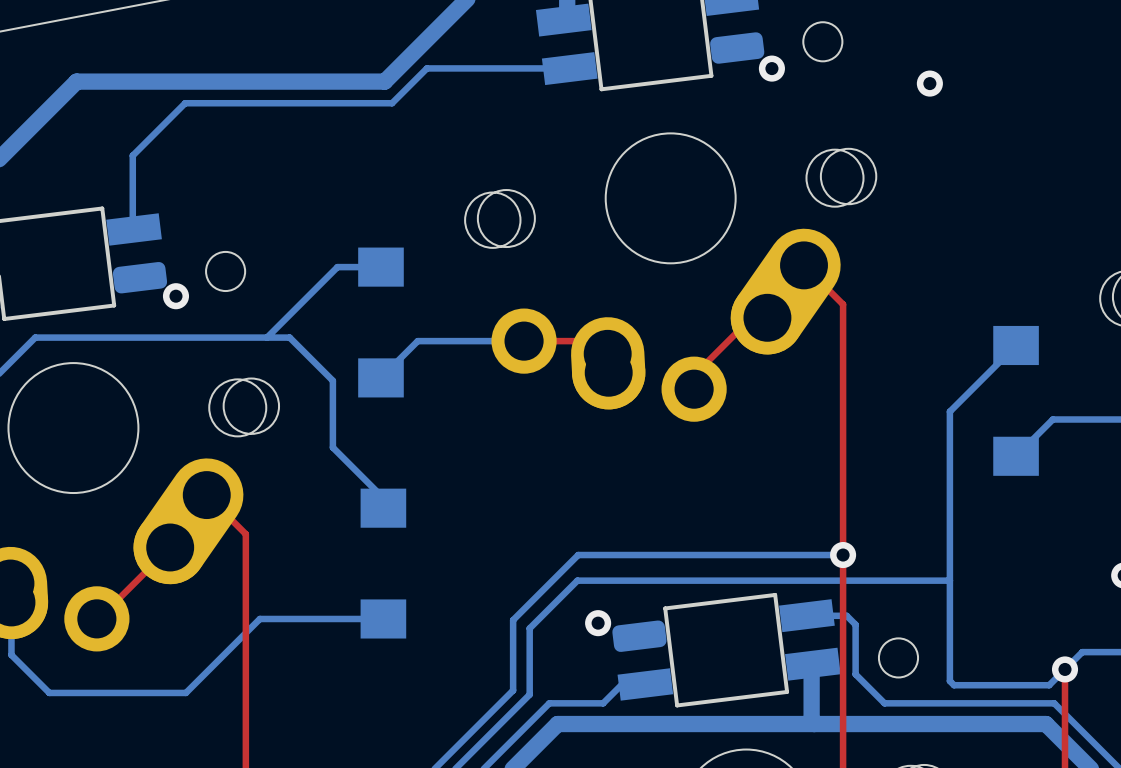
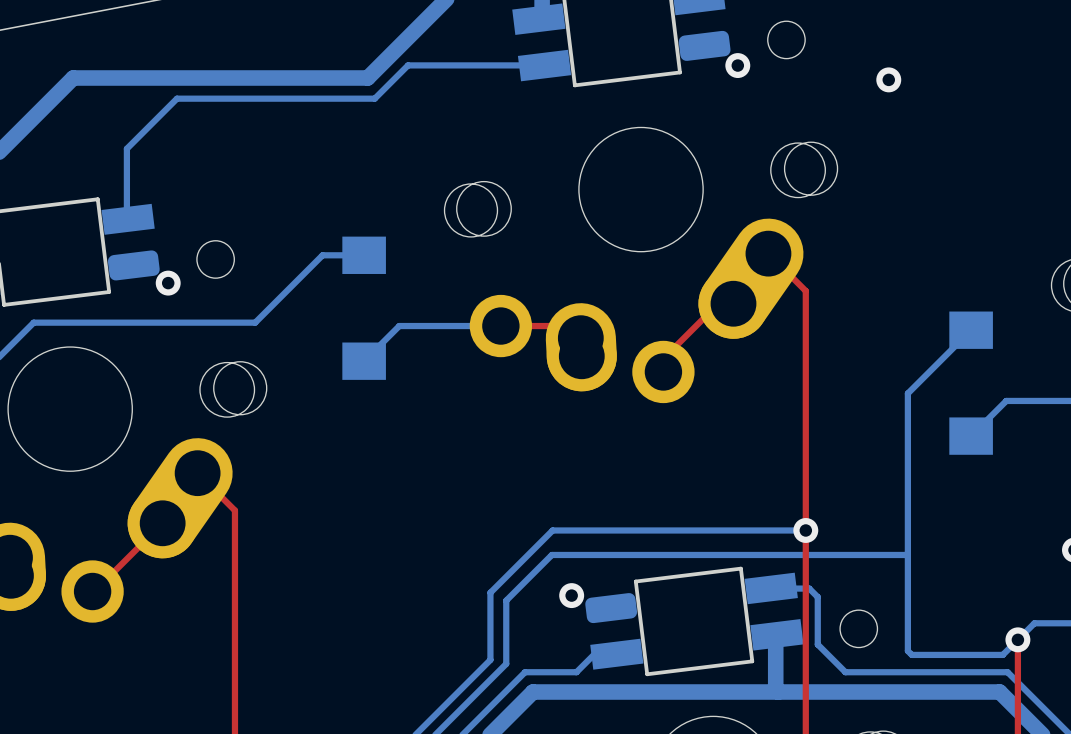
bottom track: (267, 337) (289, 337) (332, 380) (332, 447) (383, 498) (383, 508) -> none
part: (383, 563) -> none
bottom track: (11, 602) (11, 655) (49, 692) (185, 692) (259, 618) (383, 618) -> none

